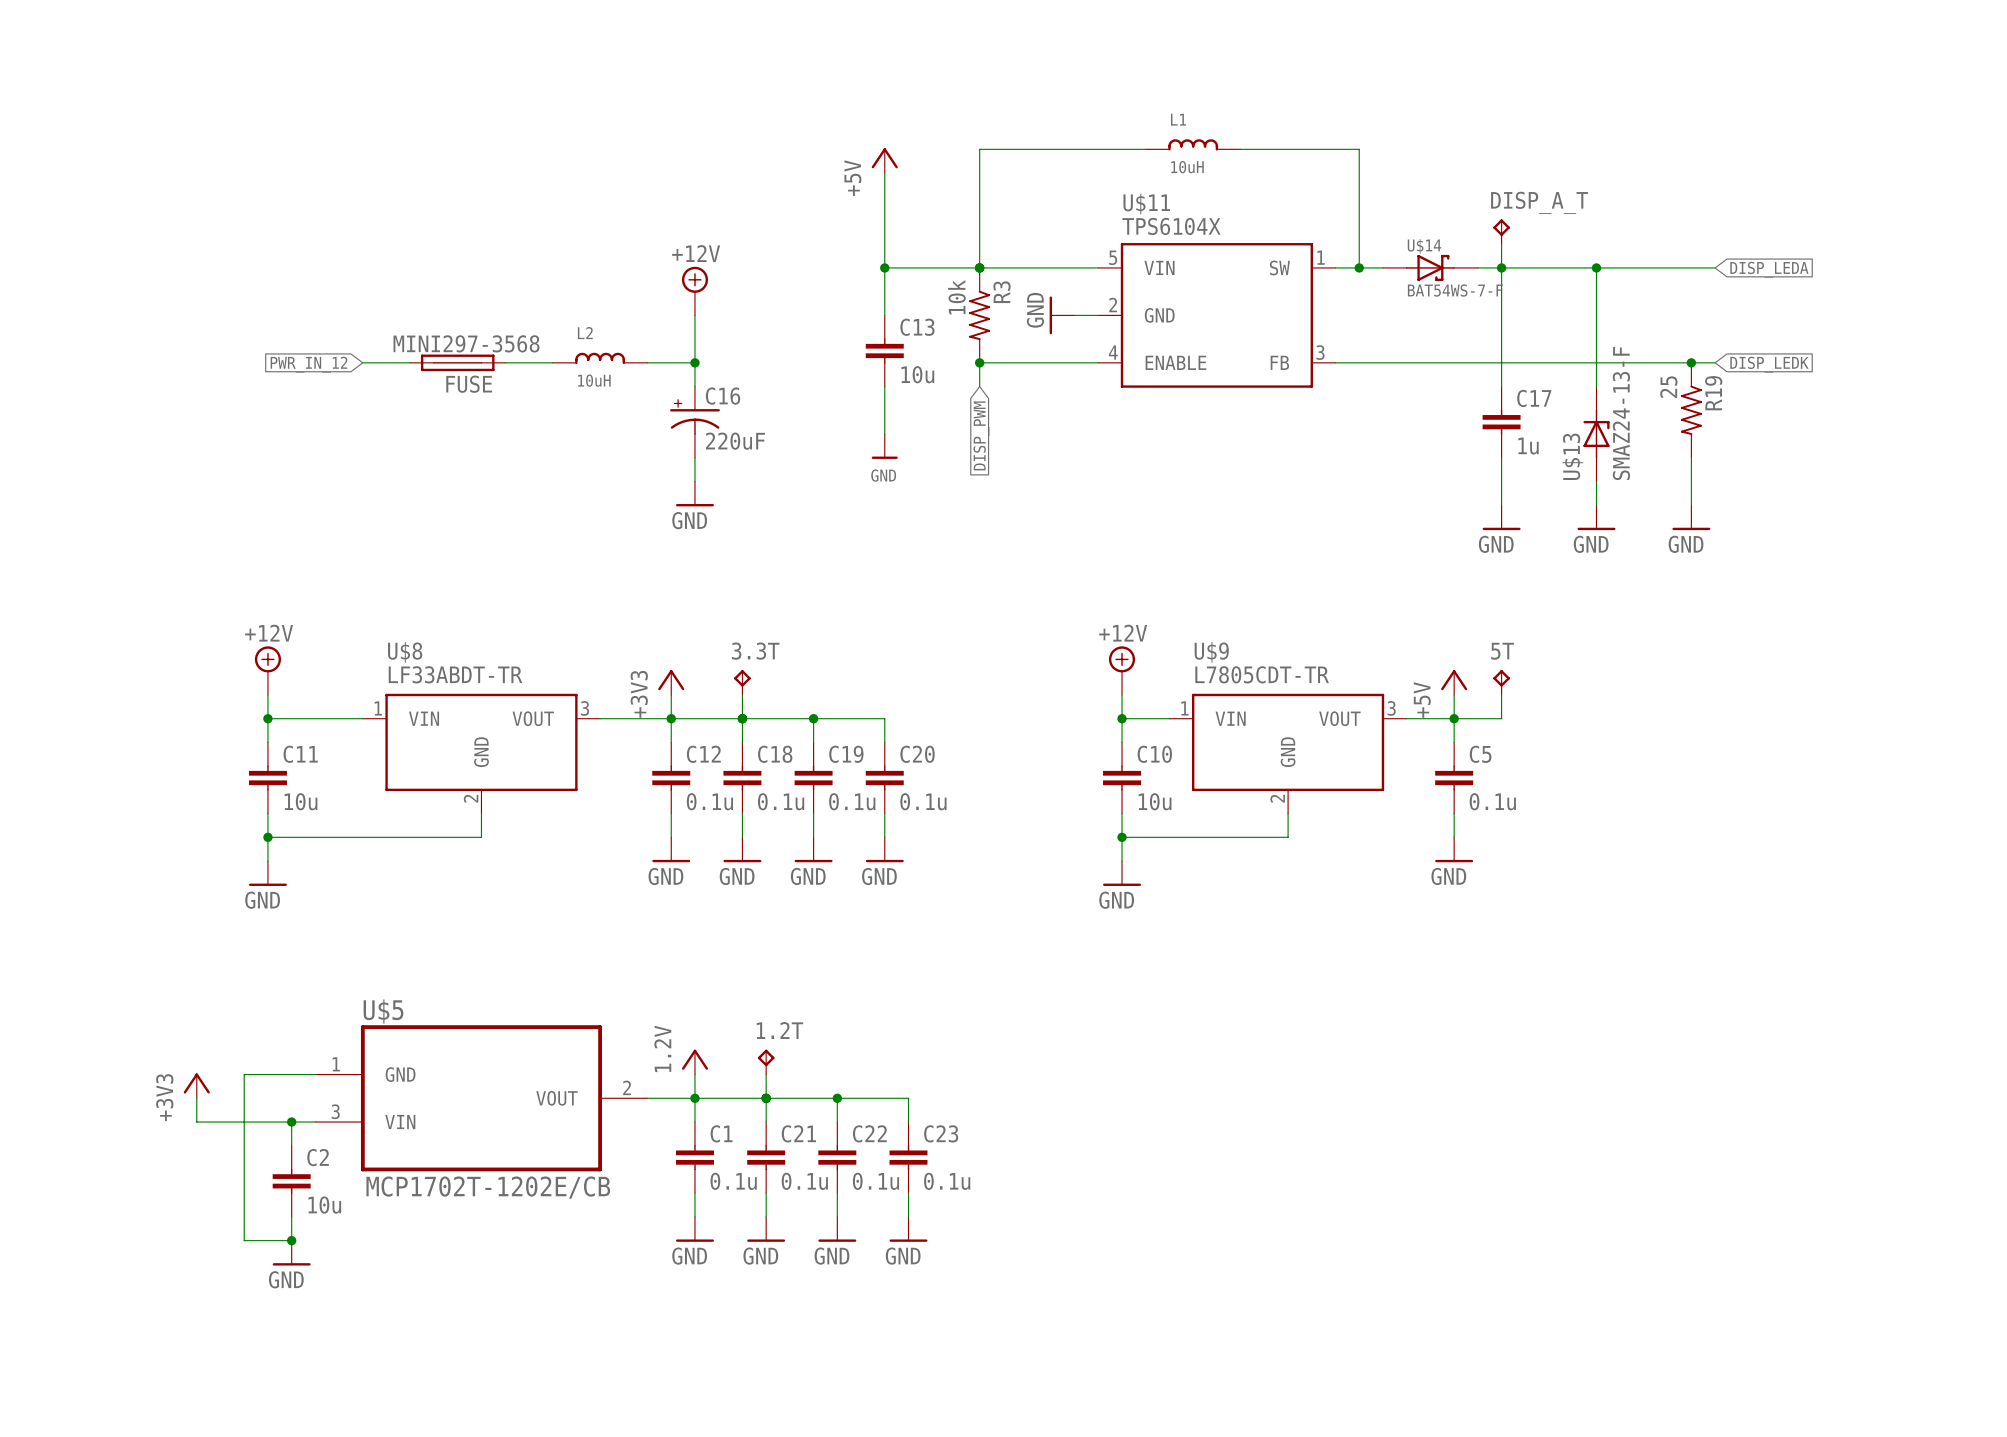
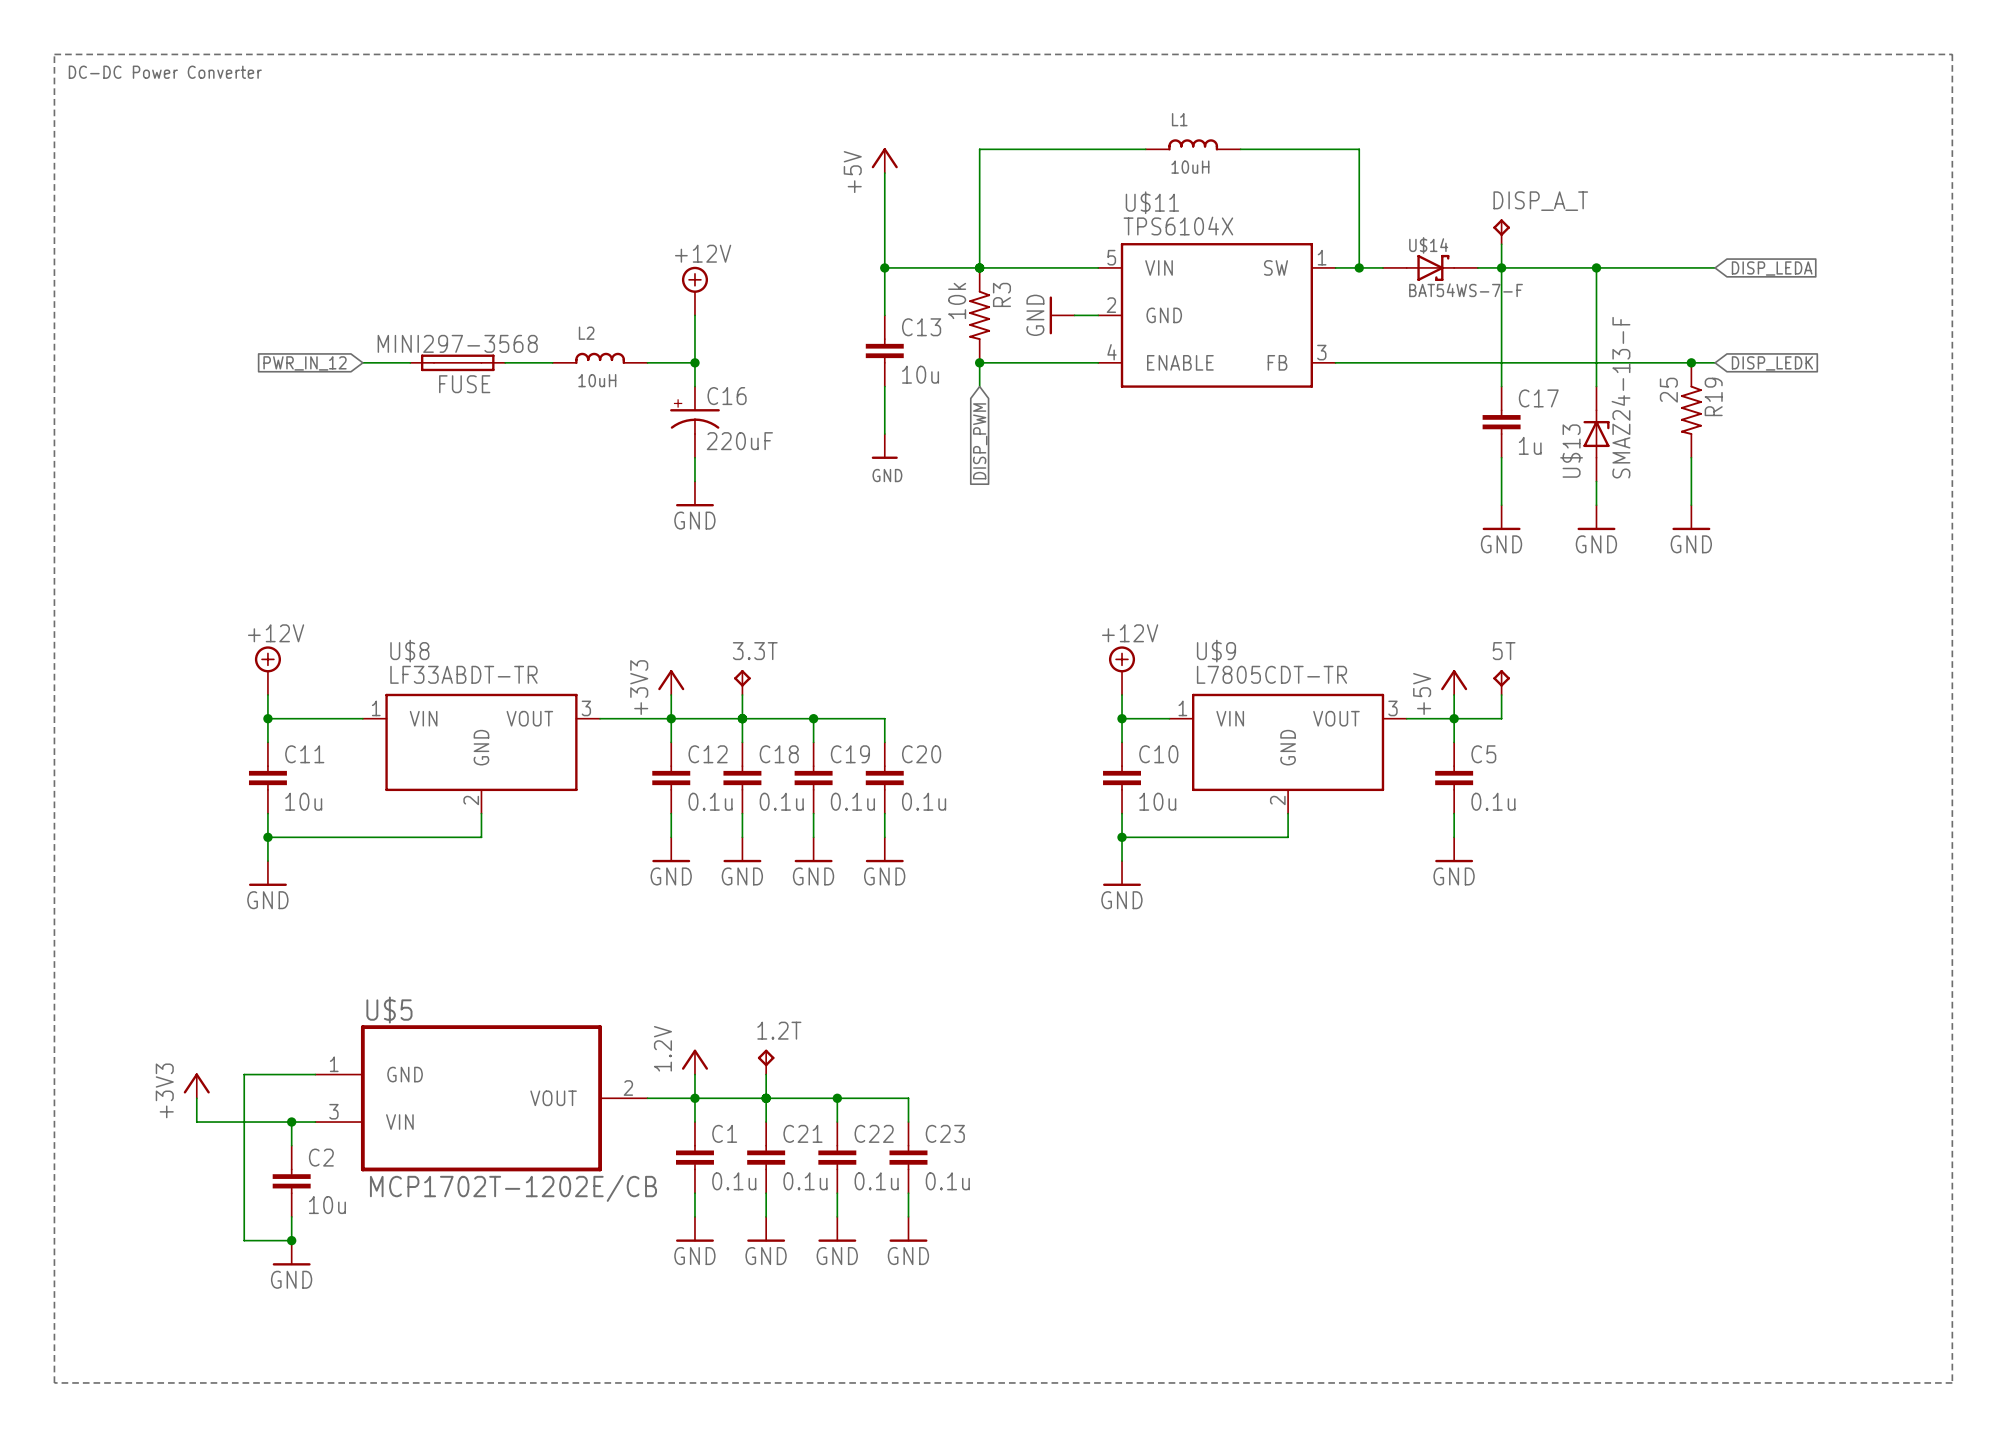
line: none -> (54, 54) (1952, 54) (1952, 1382) (54, 1382) (54, 54)
text: none -> DC-DC Power Converter (165, 72)

